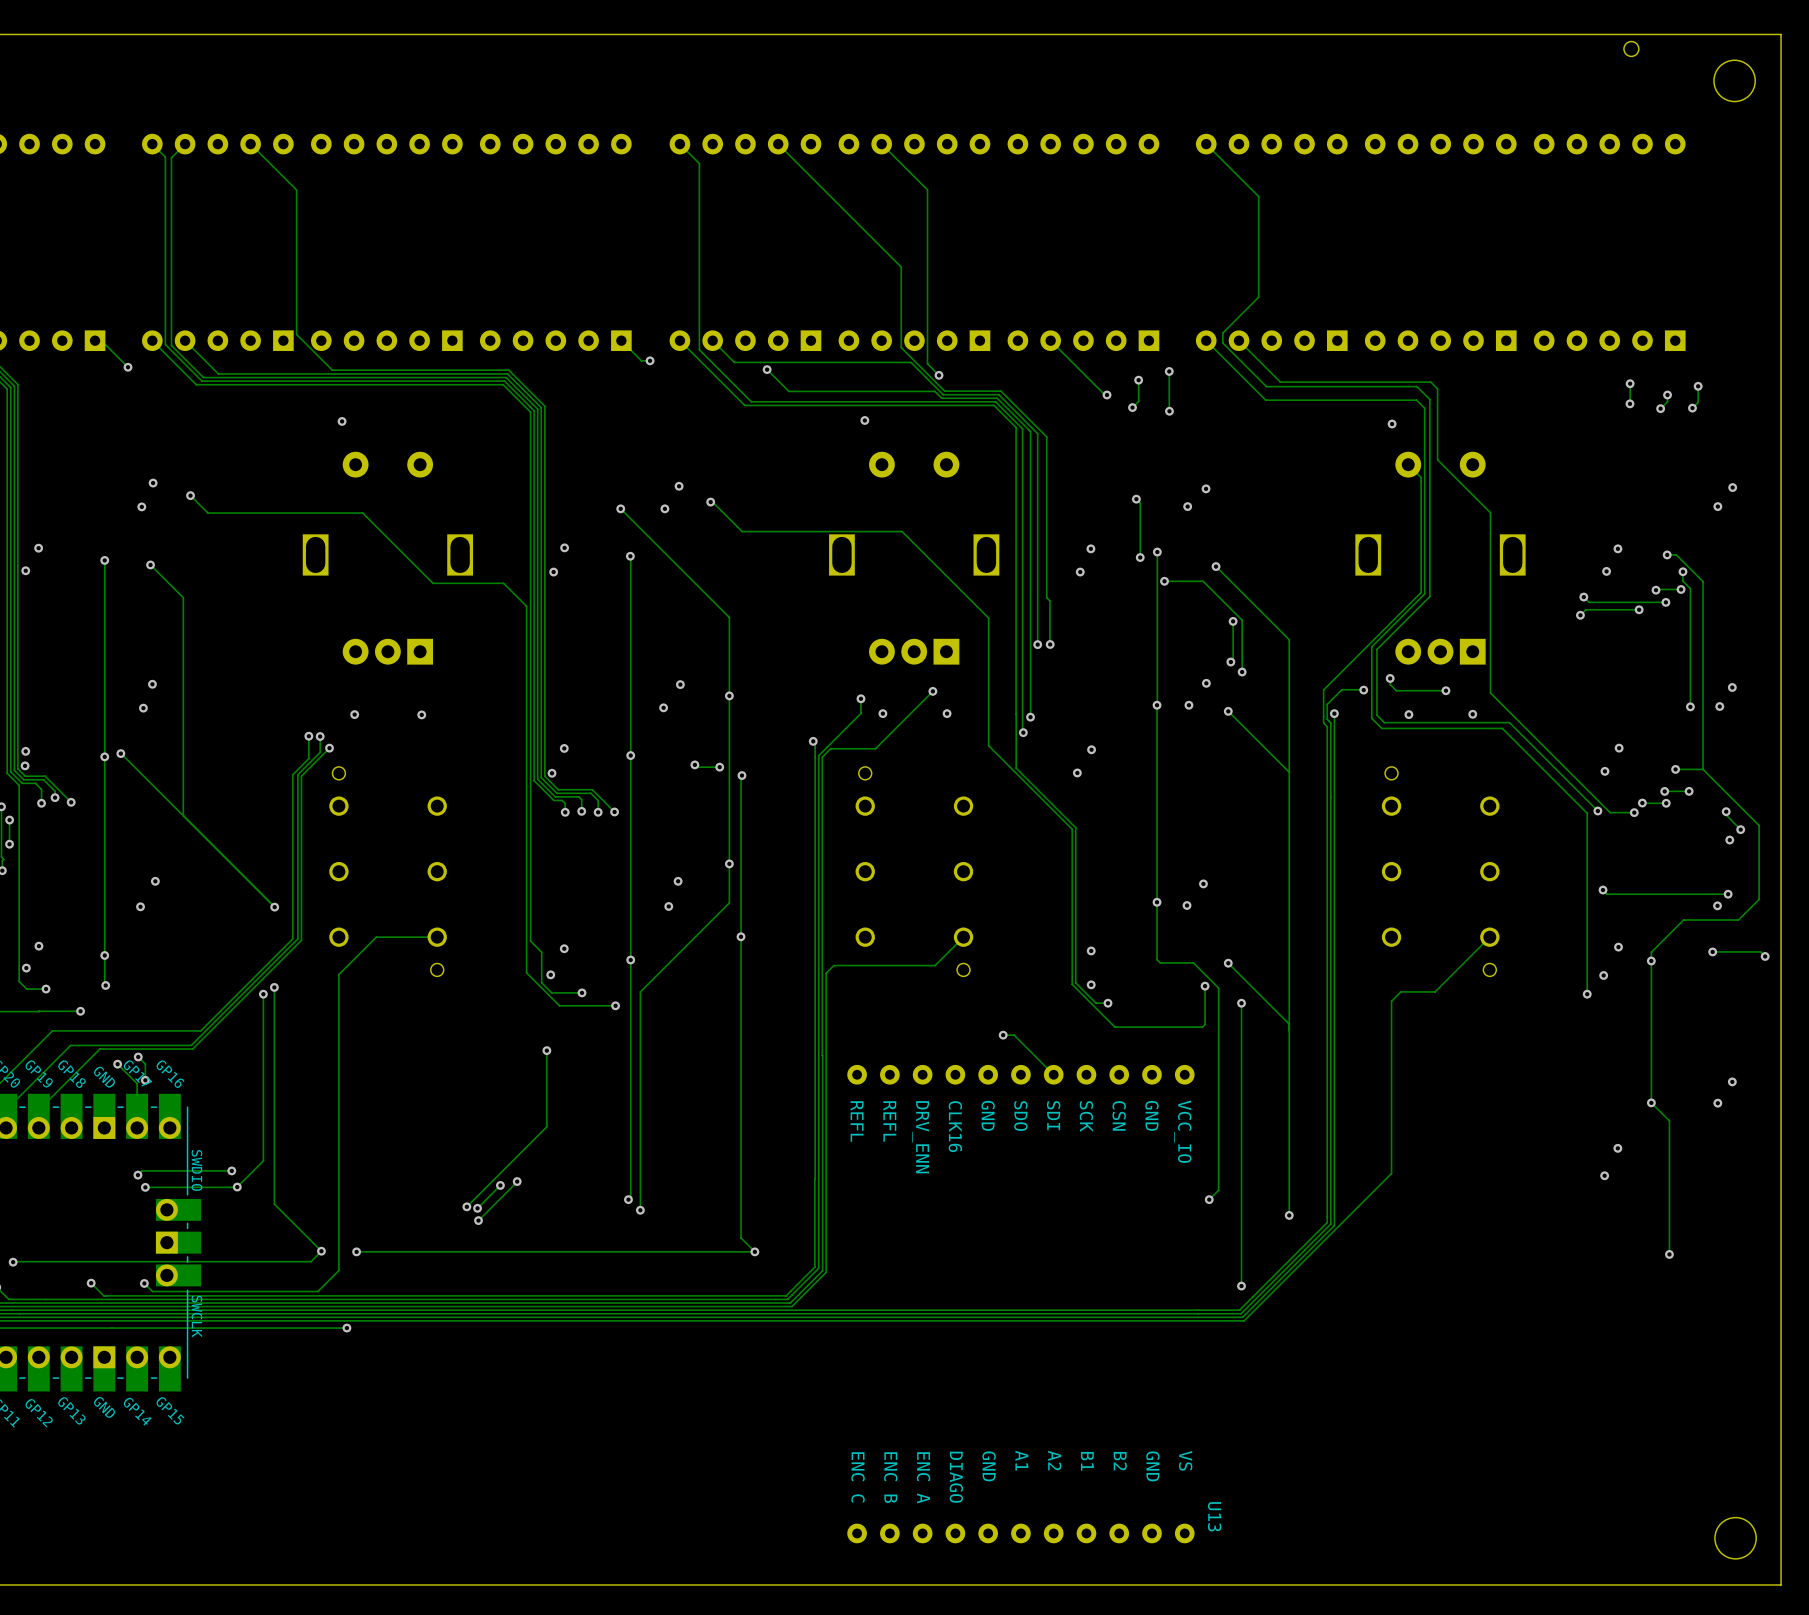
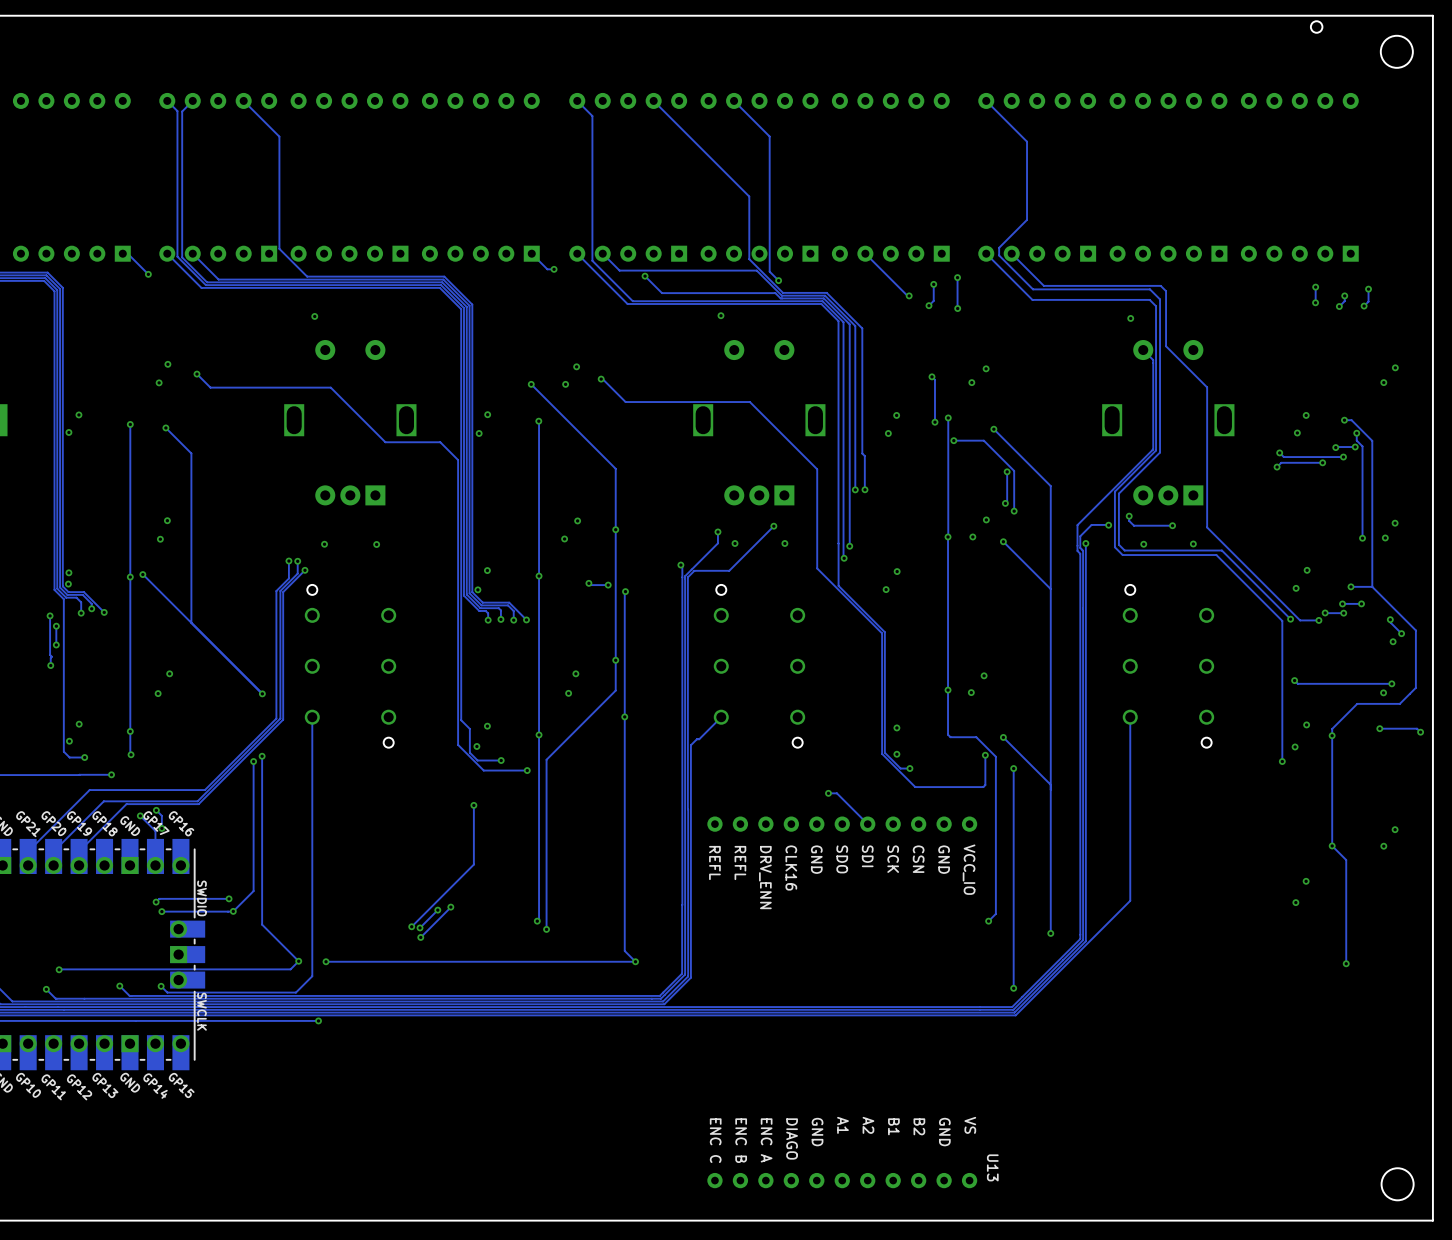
track: (437, 937) (376, 937) (338, 974) -> (312, 717) (312, 746)
track: (963, 937) (935, 965) (836, 965) -> (721, 717) (699, 739)
track: (1489, 937) (1435, 991) (1400, 991) (1391, 1001) -> (1130, 717) (1130, 766)

